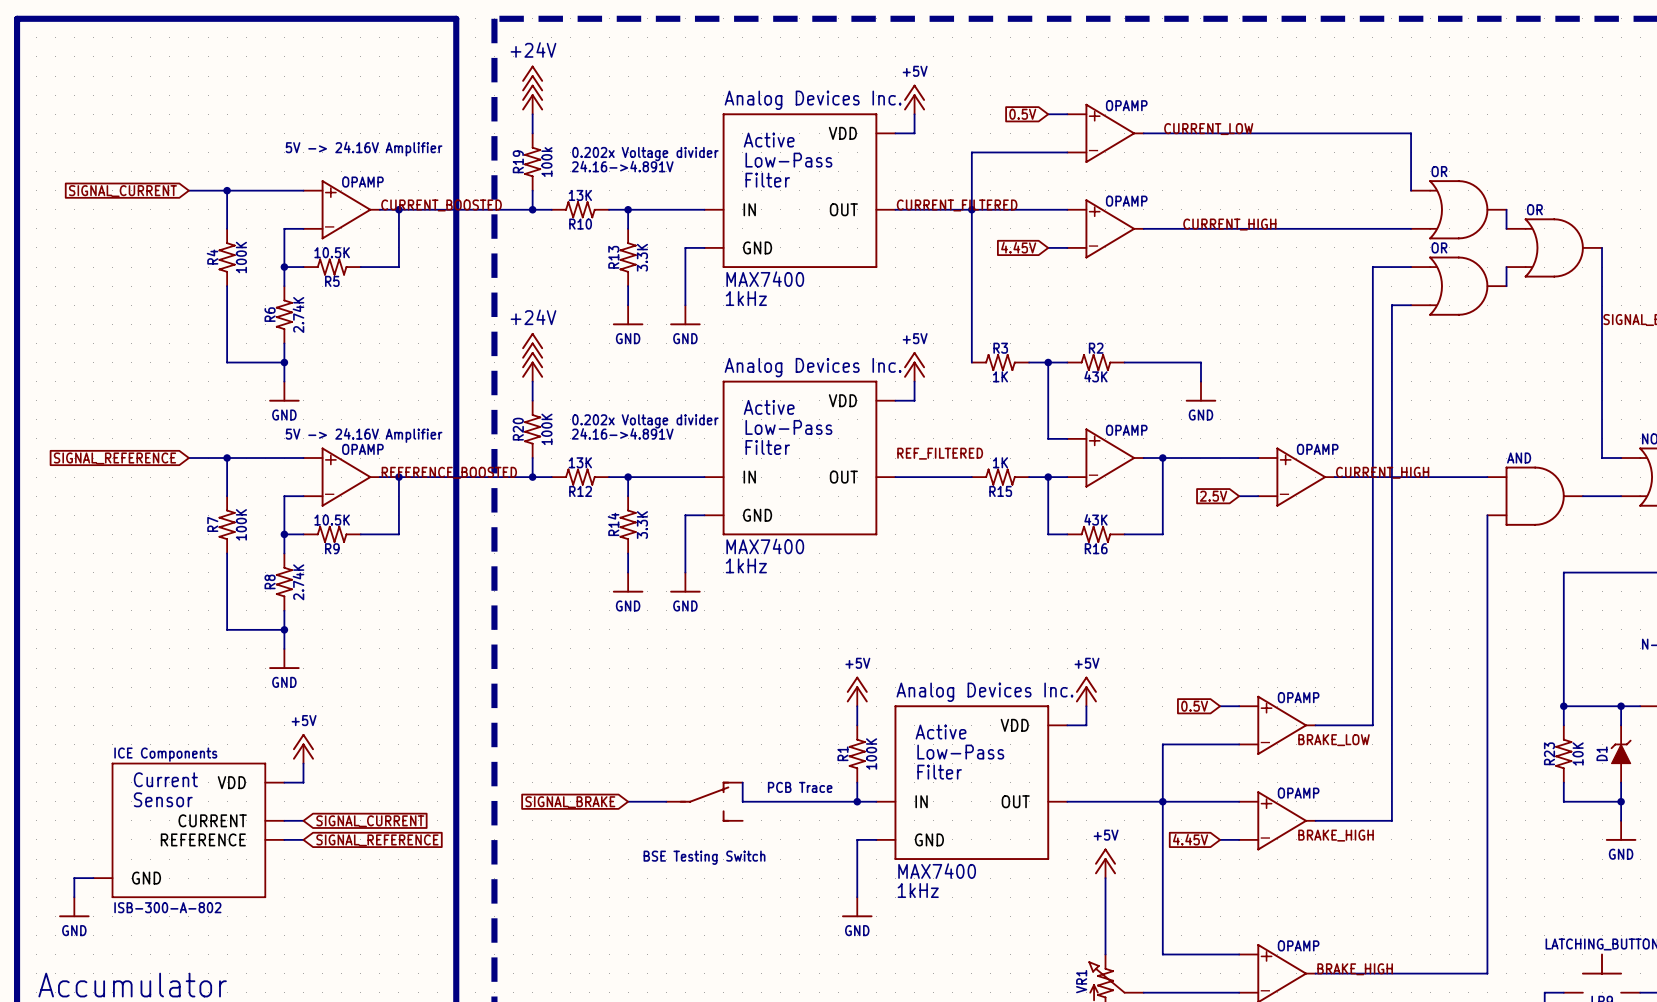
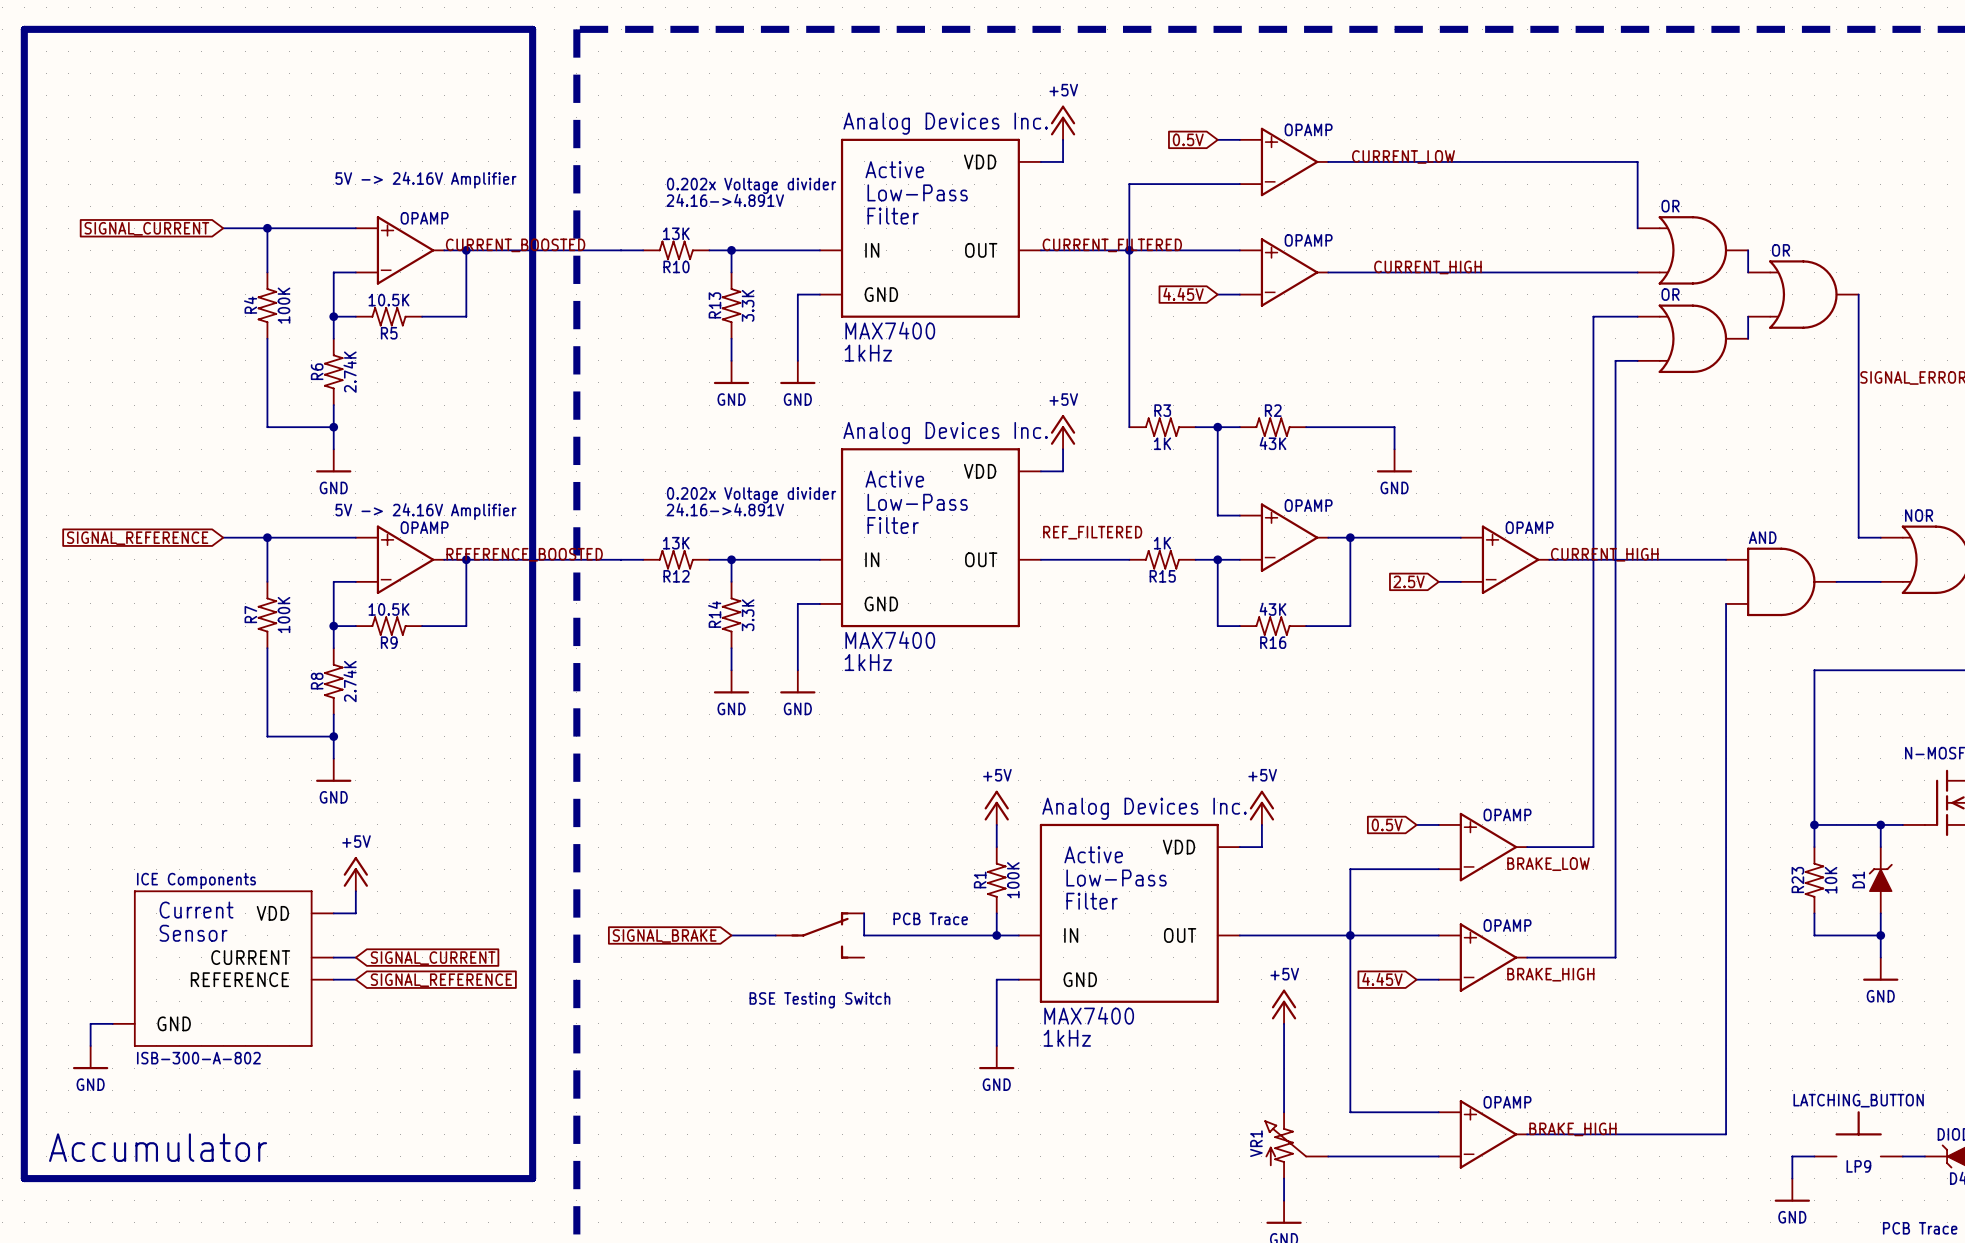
power symbol: +24V (532, 89) -> none
wire: (532, 114) (532, 133) -> none
R19: 100k (532, 162) -> none
wire: (532, 190) (532, 209) -> none
junction: (532, 209) -> none
power symbol: +24V (532, 357) -> none
wire: (532, 381) (532, 400) -> none
R20: 100K (532, 429) -> none
wire: (532, 458) (532, 477) -> none
junction: (532, 477) -> none

